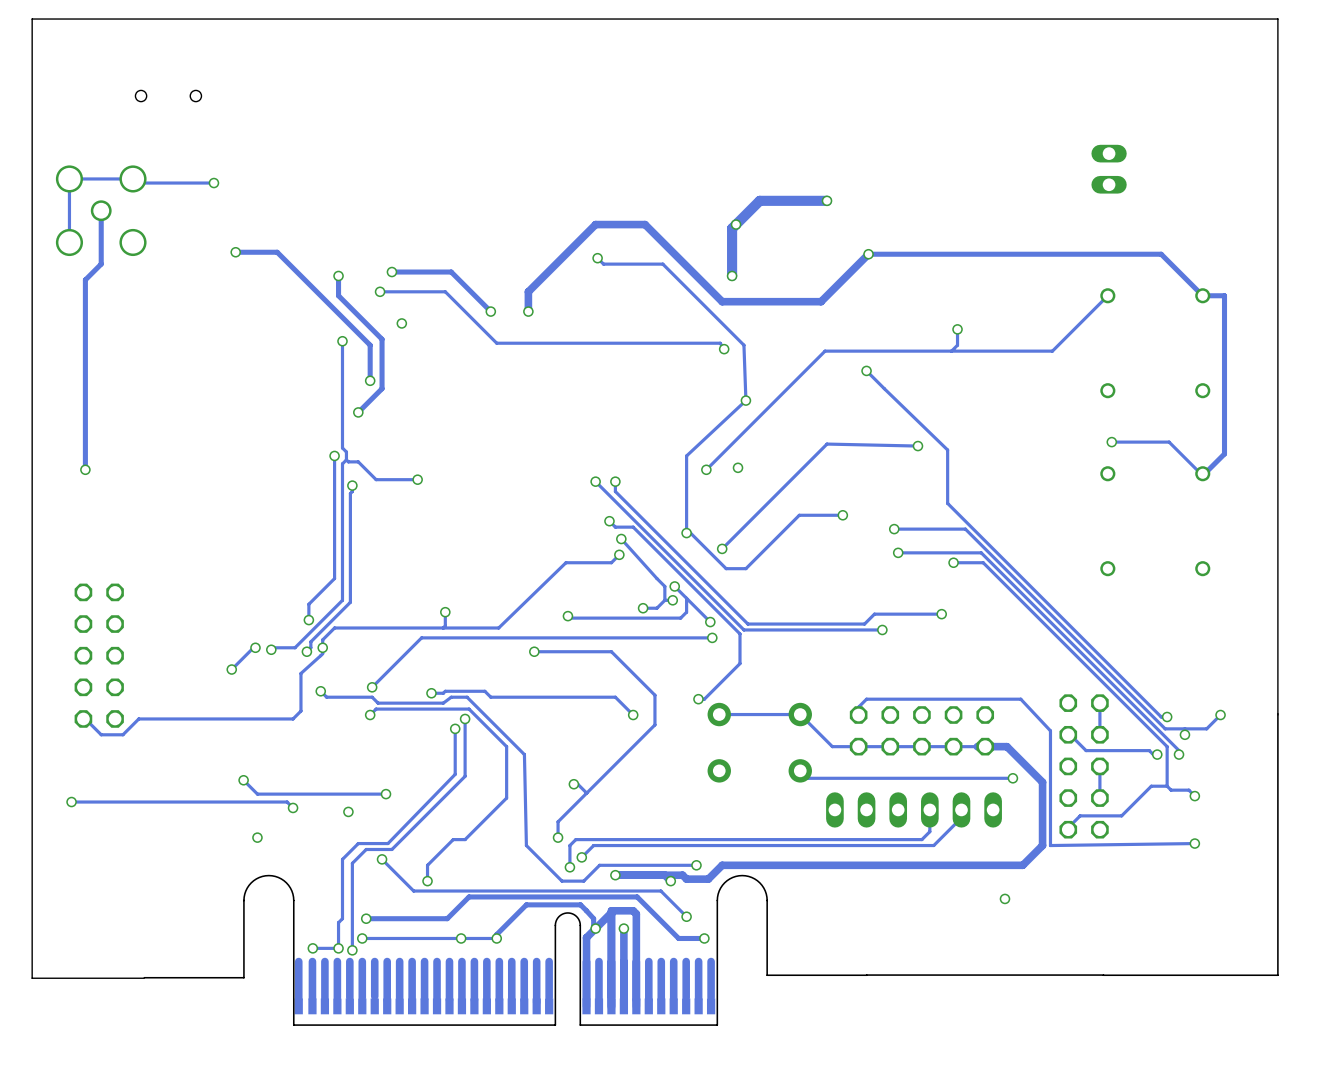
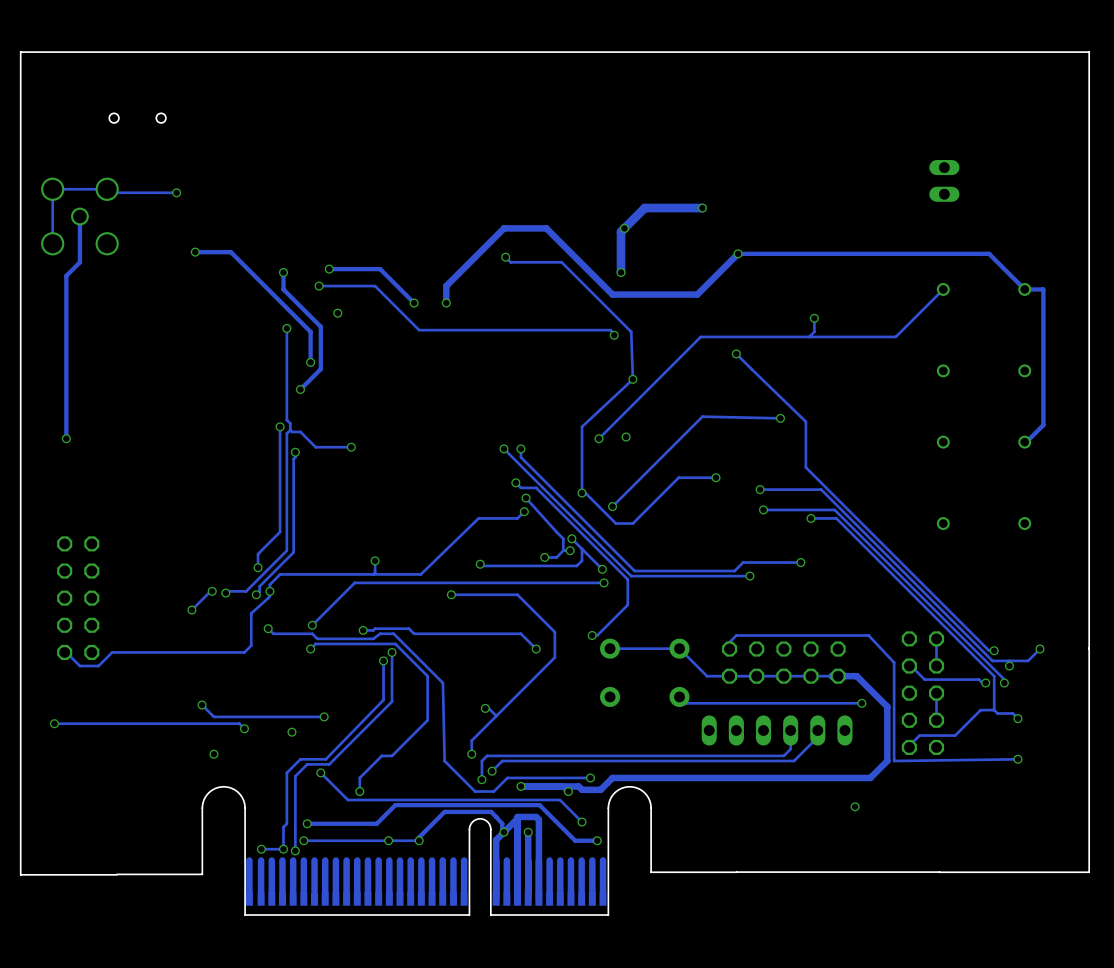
track: (1111, 442) (1169, 442) (1202, 475) (1202, 473) -> none
via: (1111, 442) -> none

